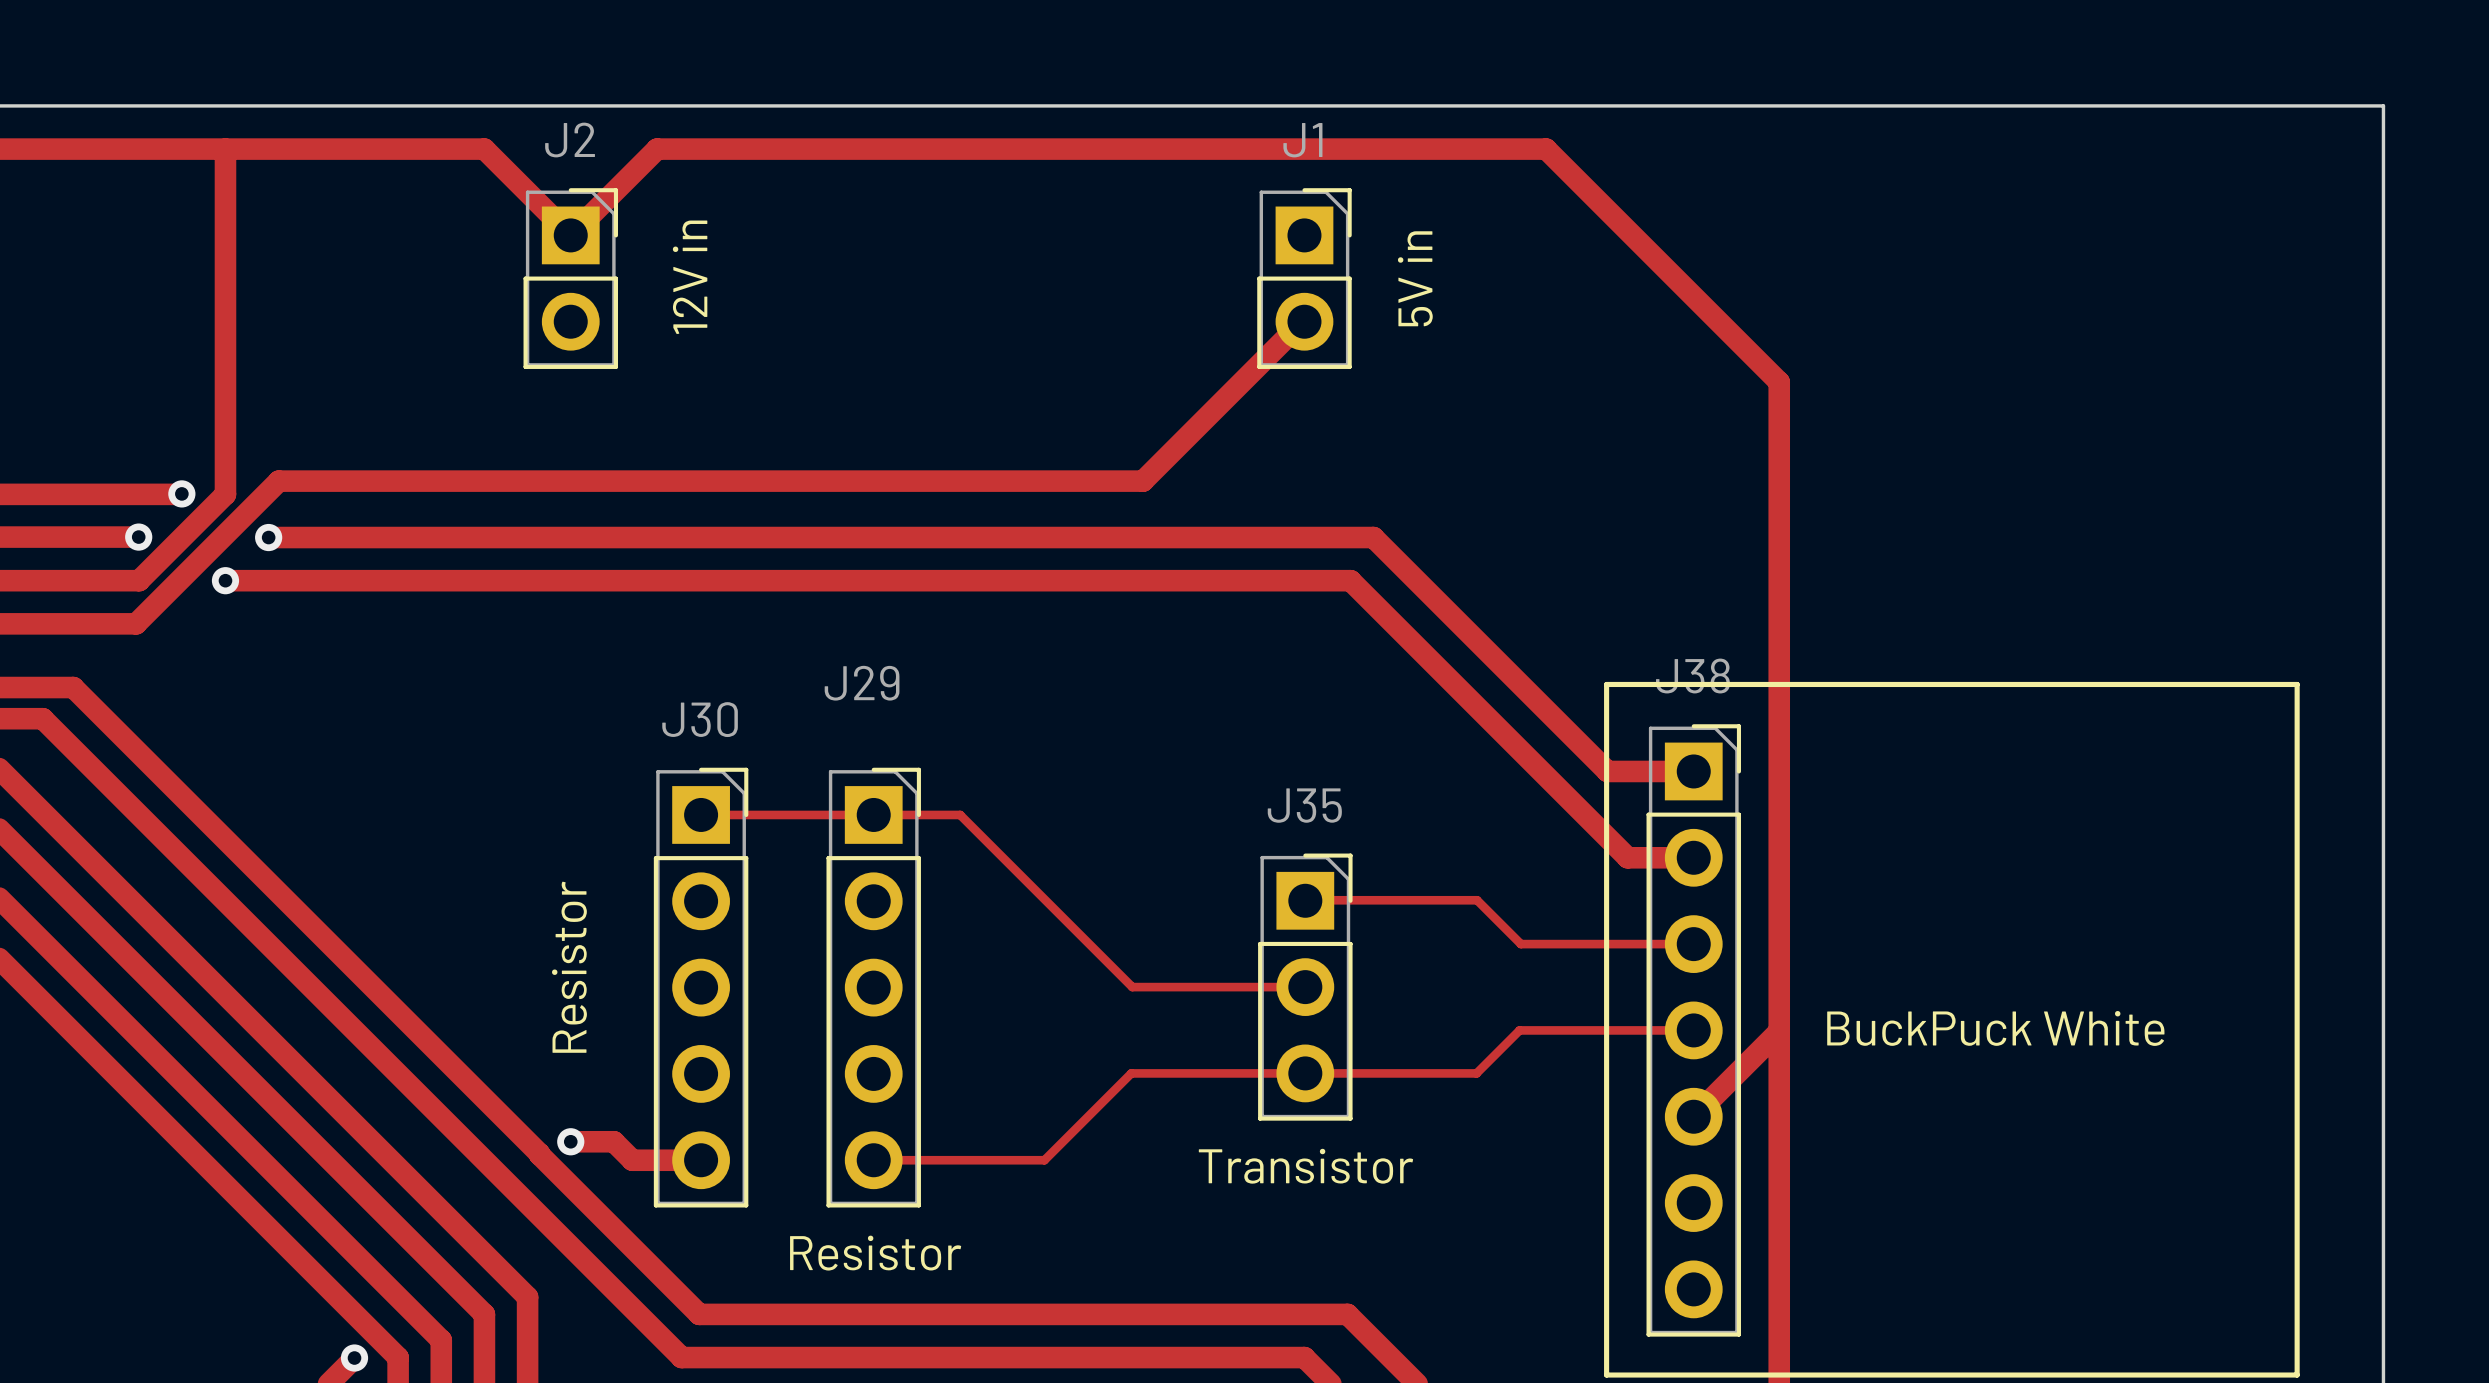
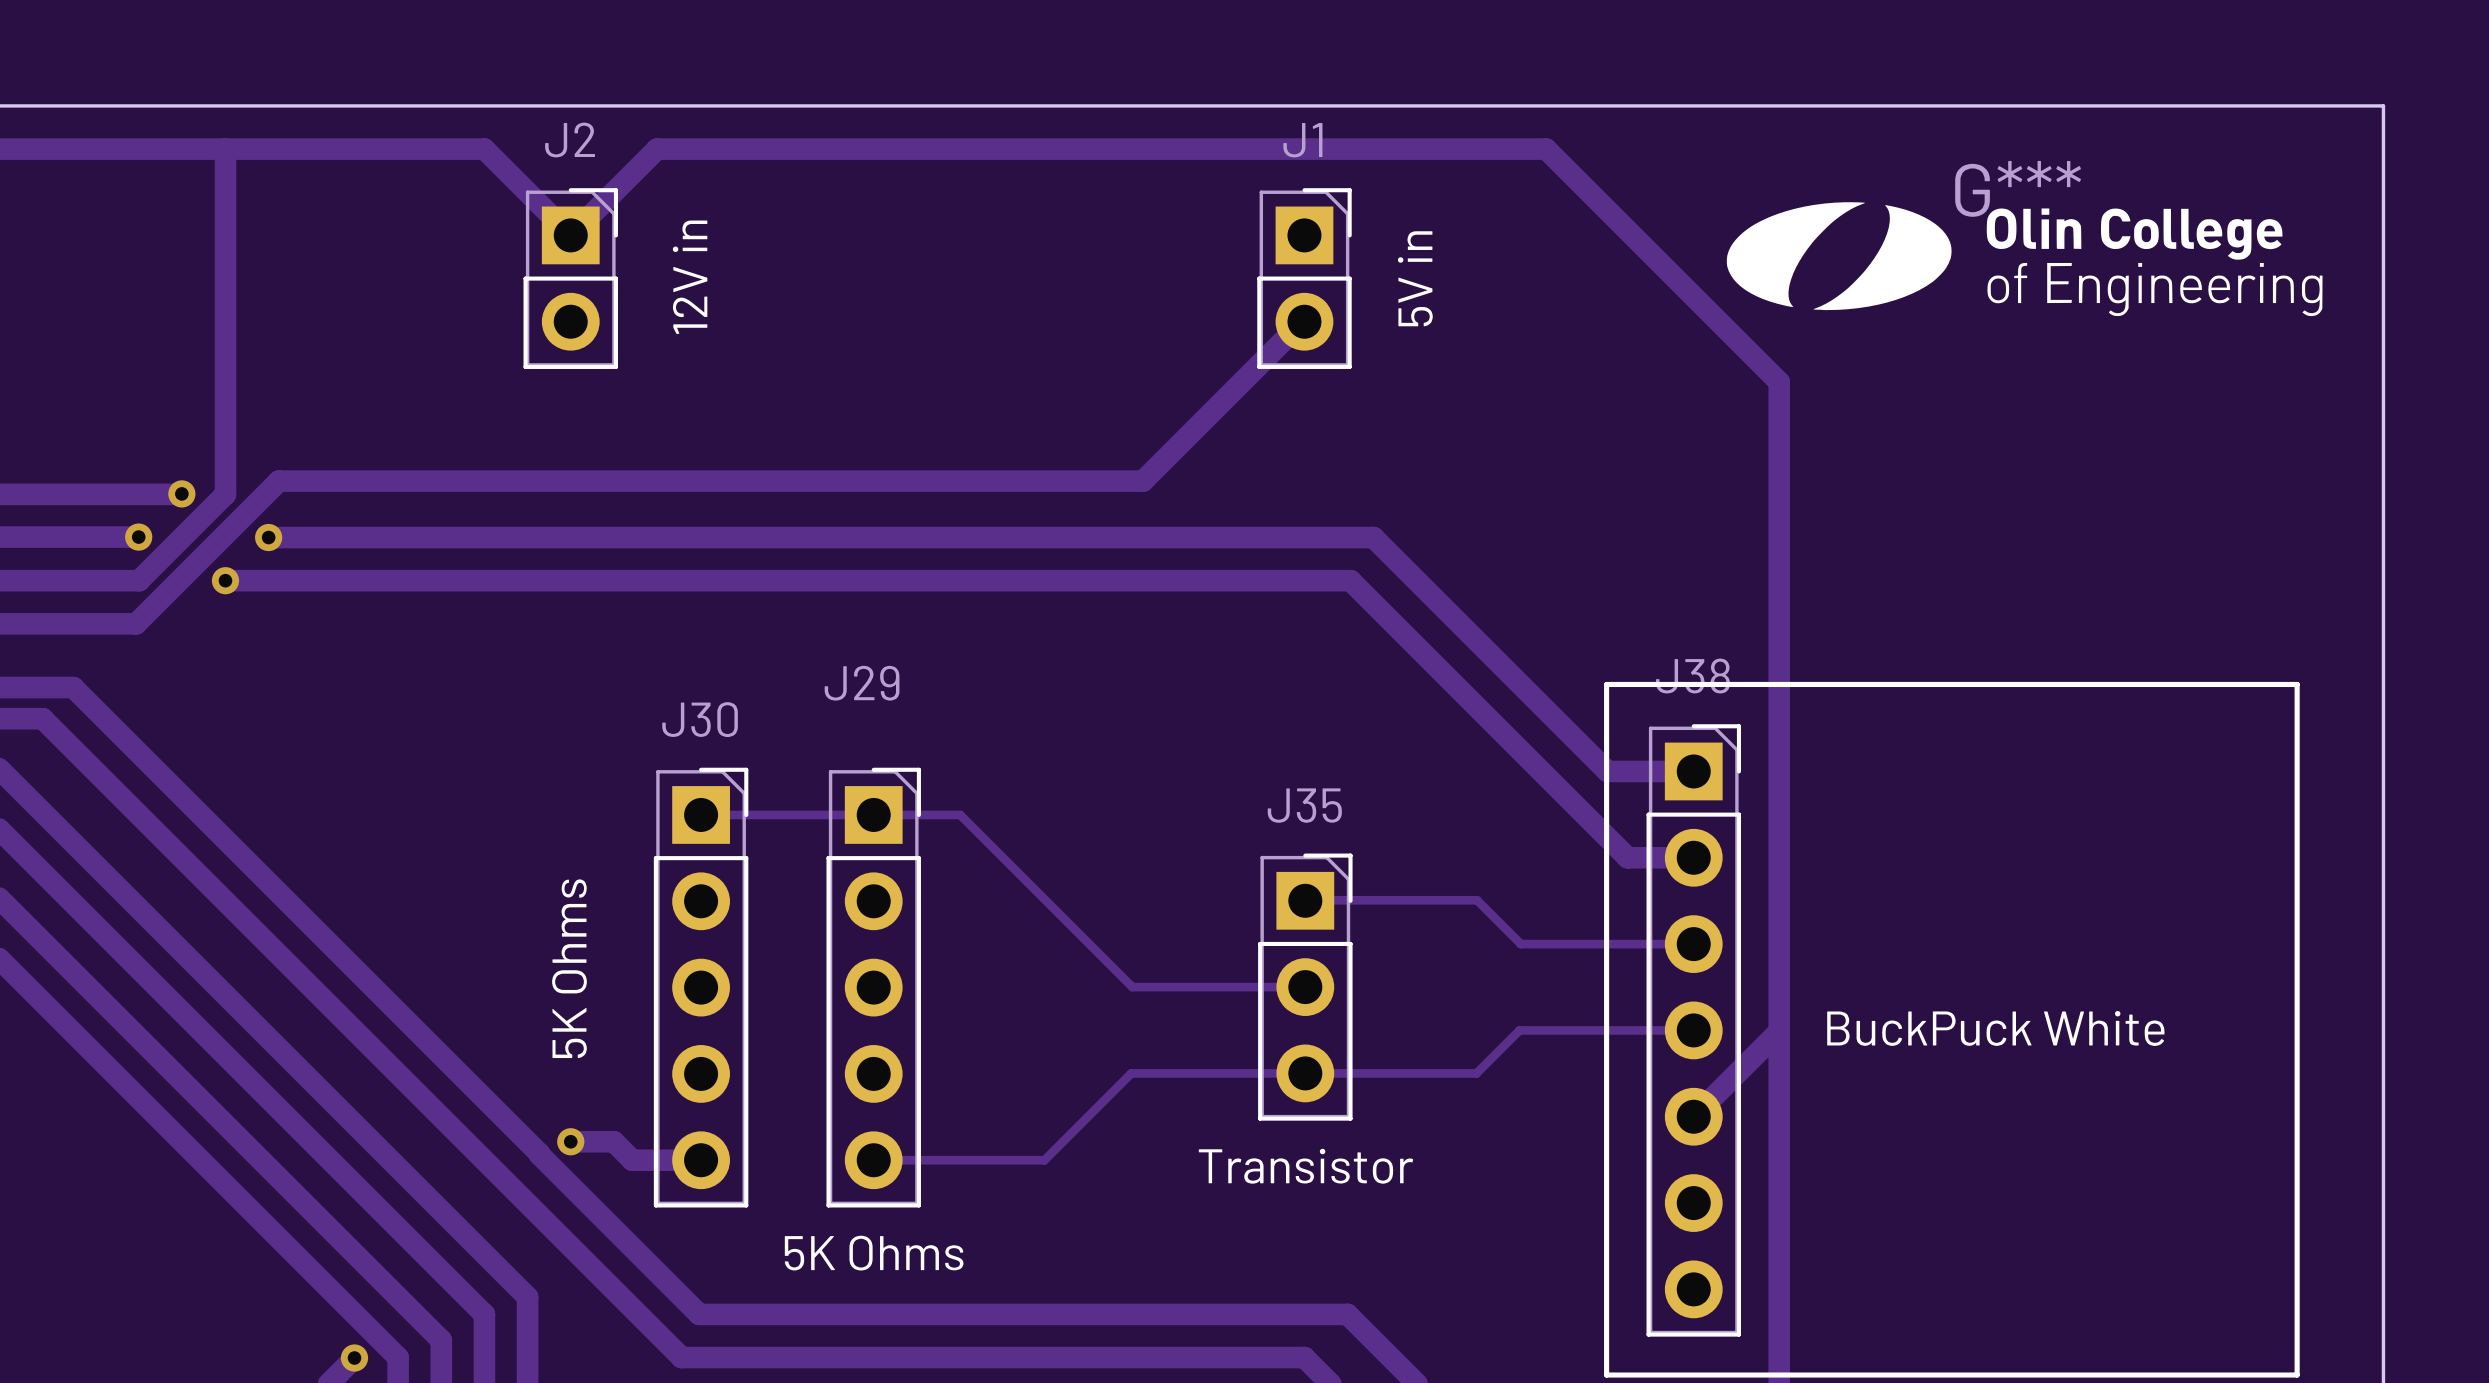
G***: none -> (2024, 259)
J30 value: Resistor (569, 967) -> 5K Ohms (569, 968)
J29 value: Resistor (875, 1253) -> 5K Ohms (874, 1253)

